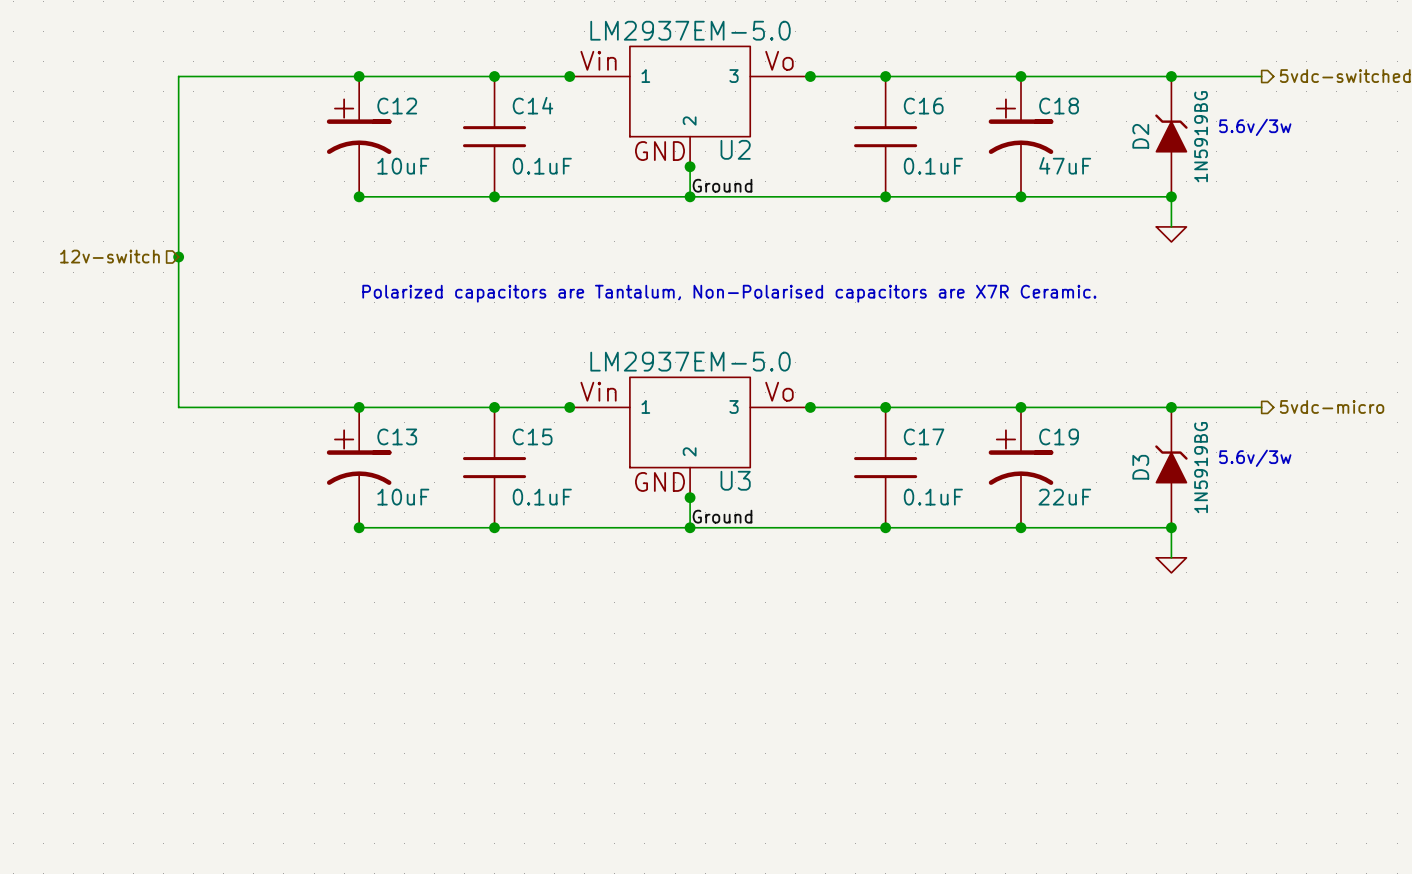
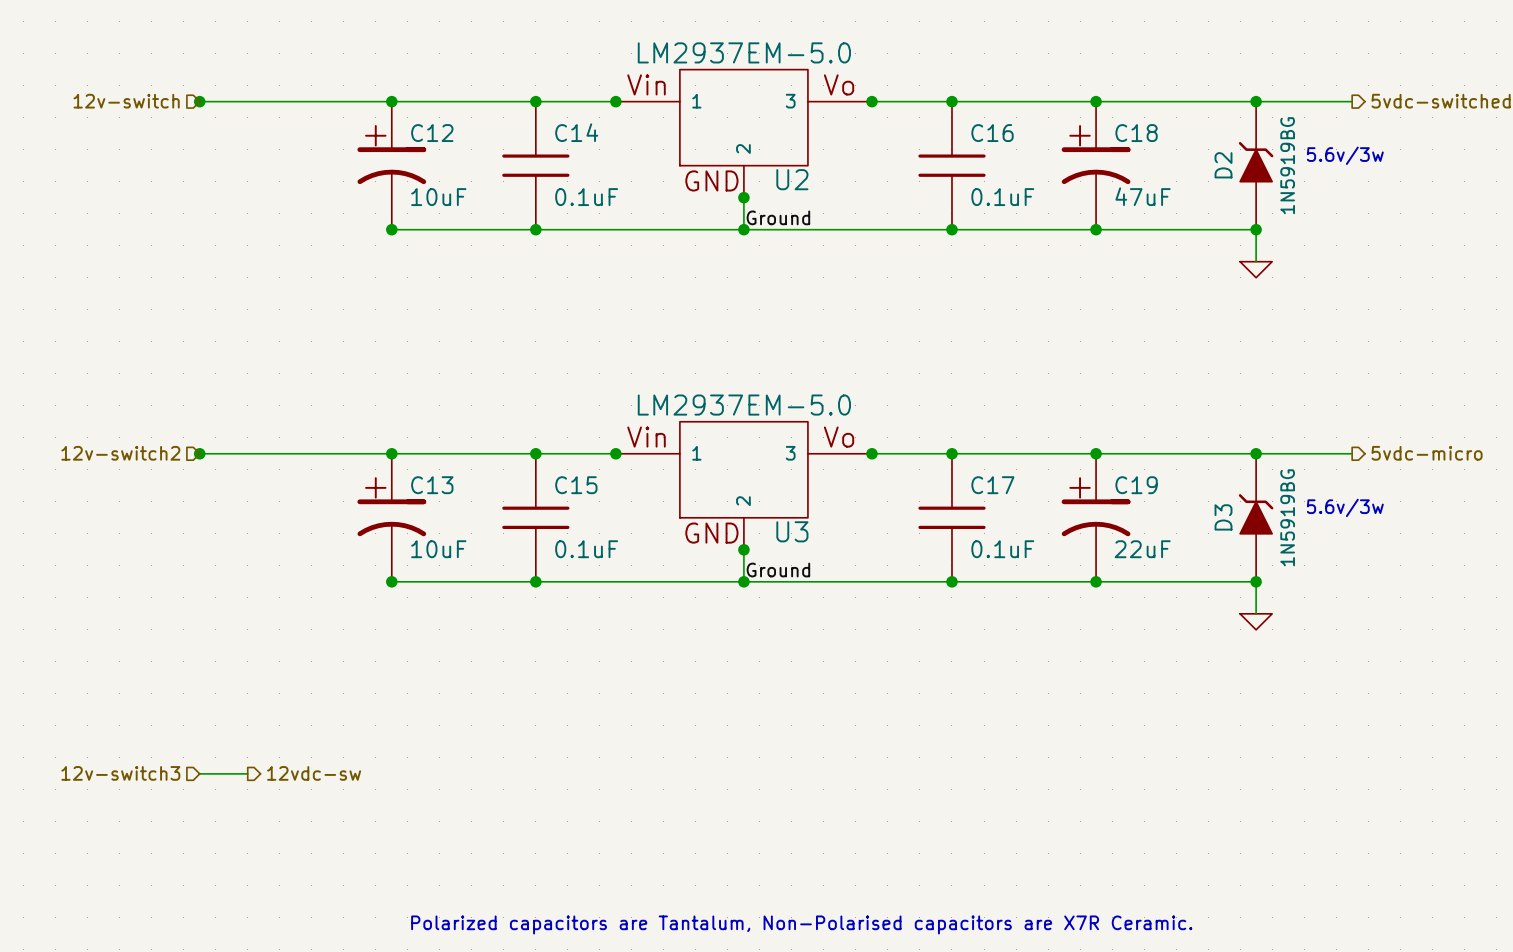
wire: (178, 76) (178, 407) -> none
junction: none -> (199, 101)
hierarchical label position: 12v-switch (109, 256) -> 12v-switch (126, 101)
junction: (178, 257) -> none
text: Polarized capacitors are Tantalum, Non-Polarised capacitors are X7R Ceramic. (729, 293) -> none
hierarchical label: none -> 12v-switch2 (120, 453)
junction: none -> (199, 453)
hierarchical label: none -> 12v-switch3 (120, 773)
hierarchical label: none -> 12vdc-sw (314, 773)
wire: none -> (199, 773) (247, 773)
text: none -> Polarized capacitors are Tantalum, Non-Polarised capacitors are X7R Ceramic. (801, 924)

